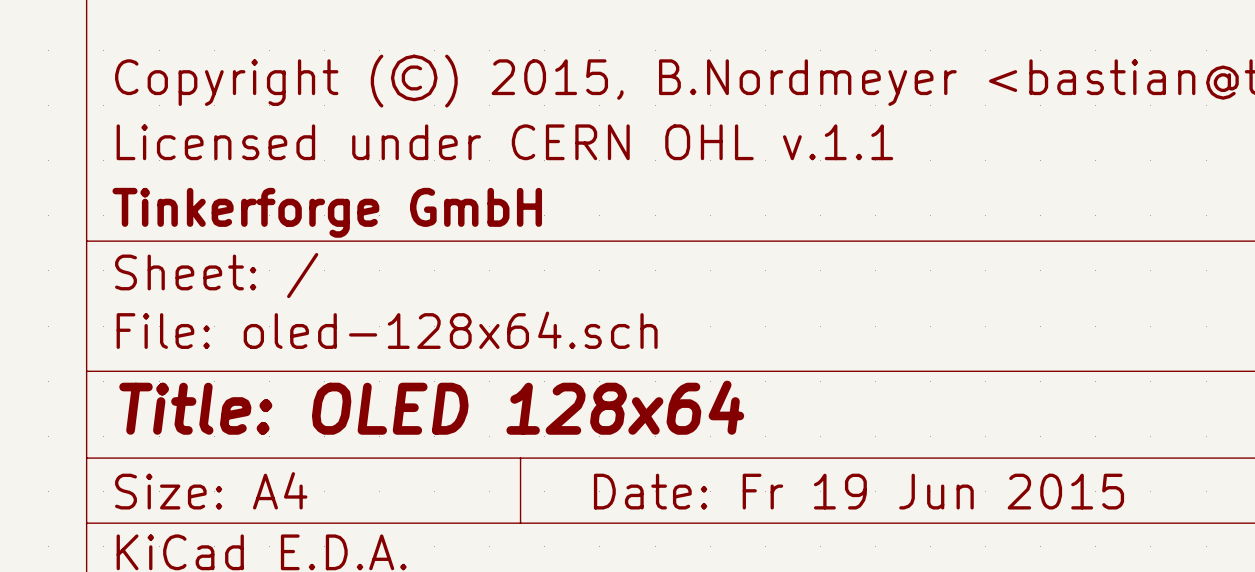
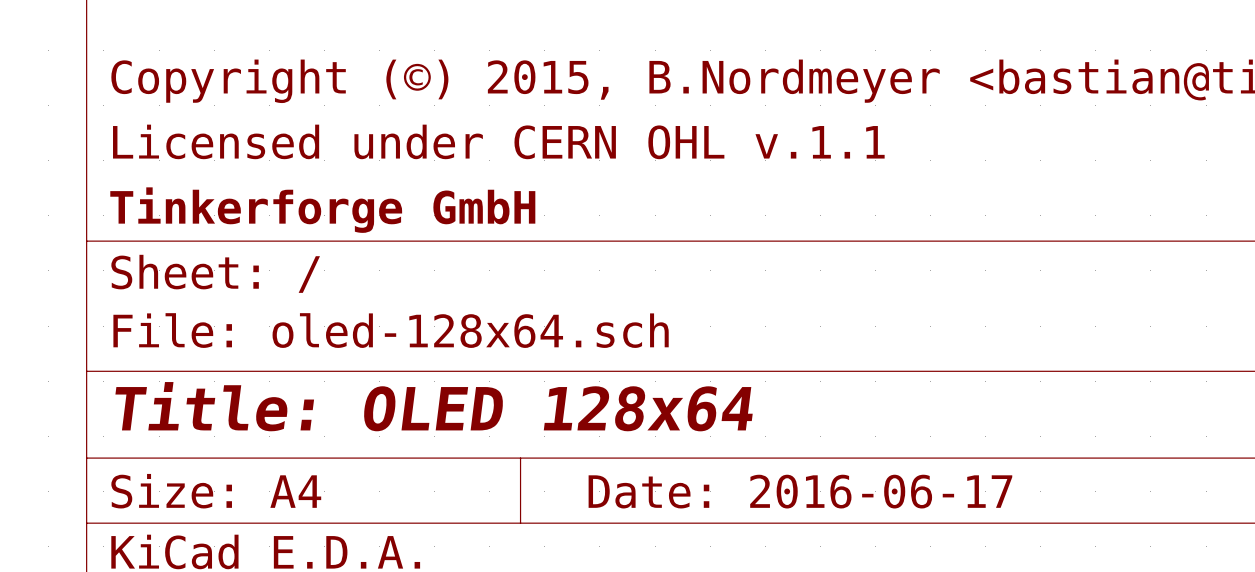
title block: Date: Fr 19 Jun 2015 (858, 491) -> Date: 2016-06-17 (800, 491)

